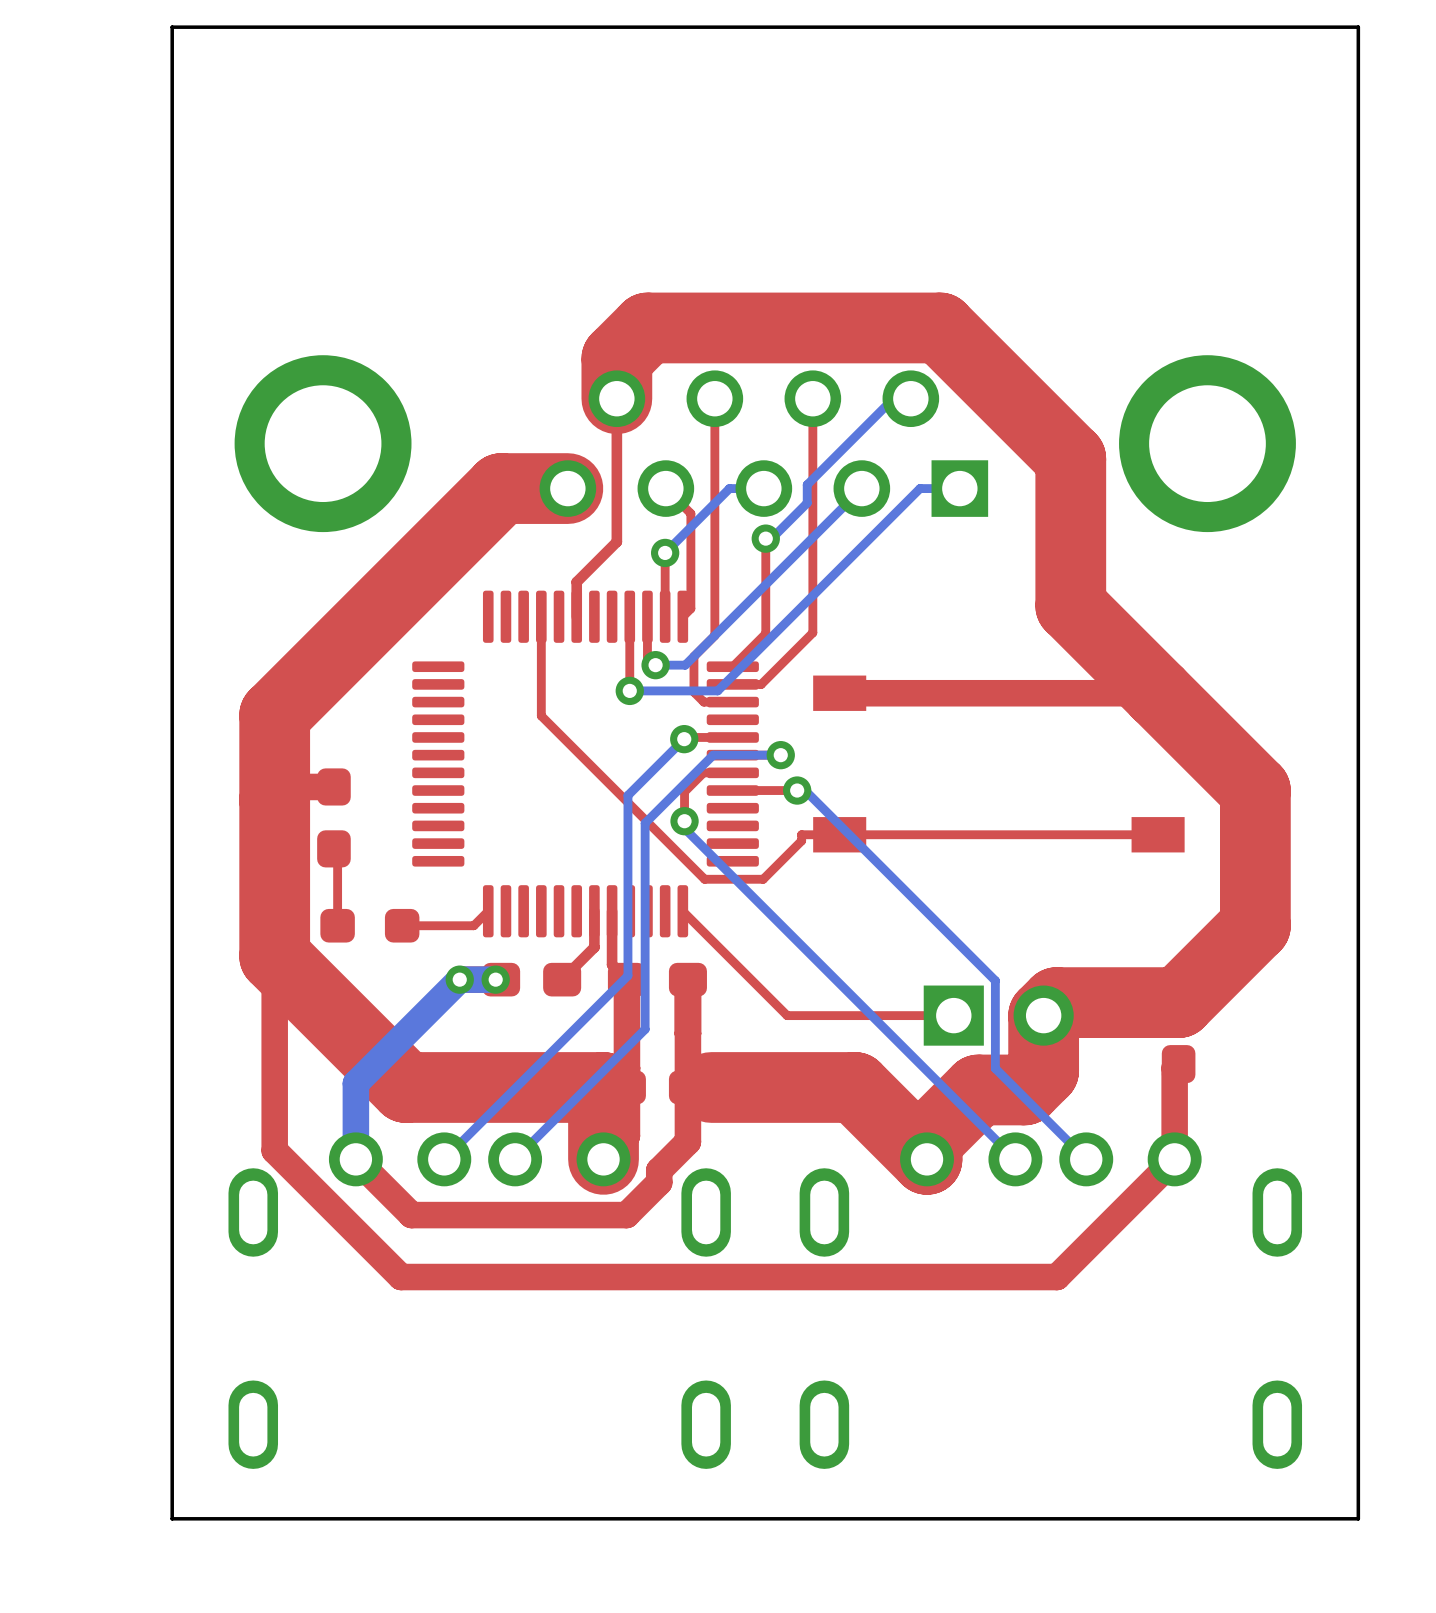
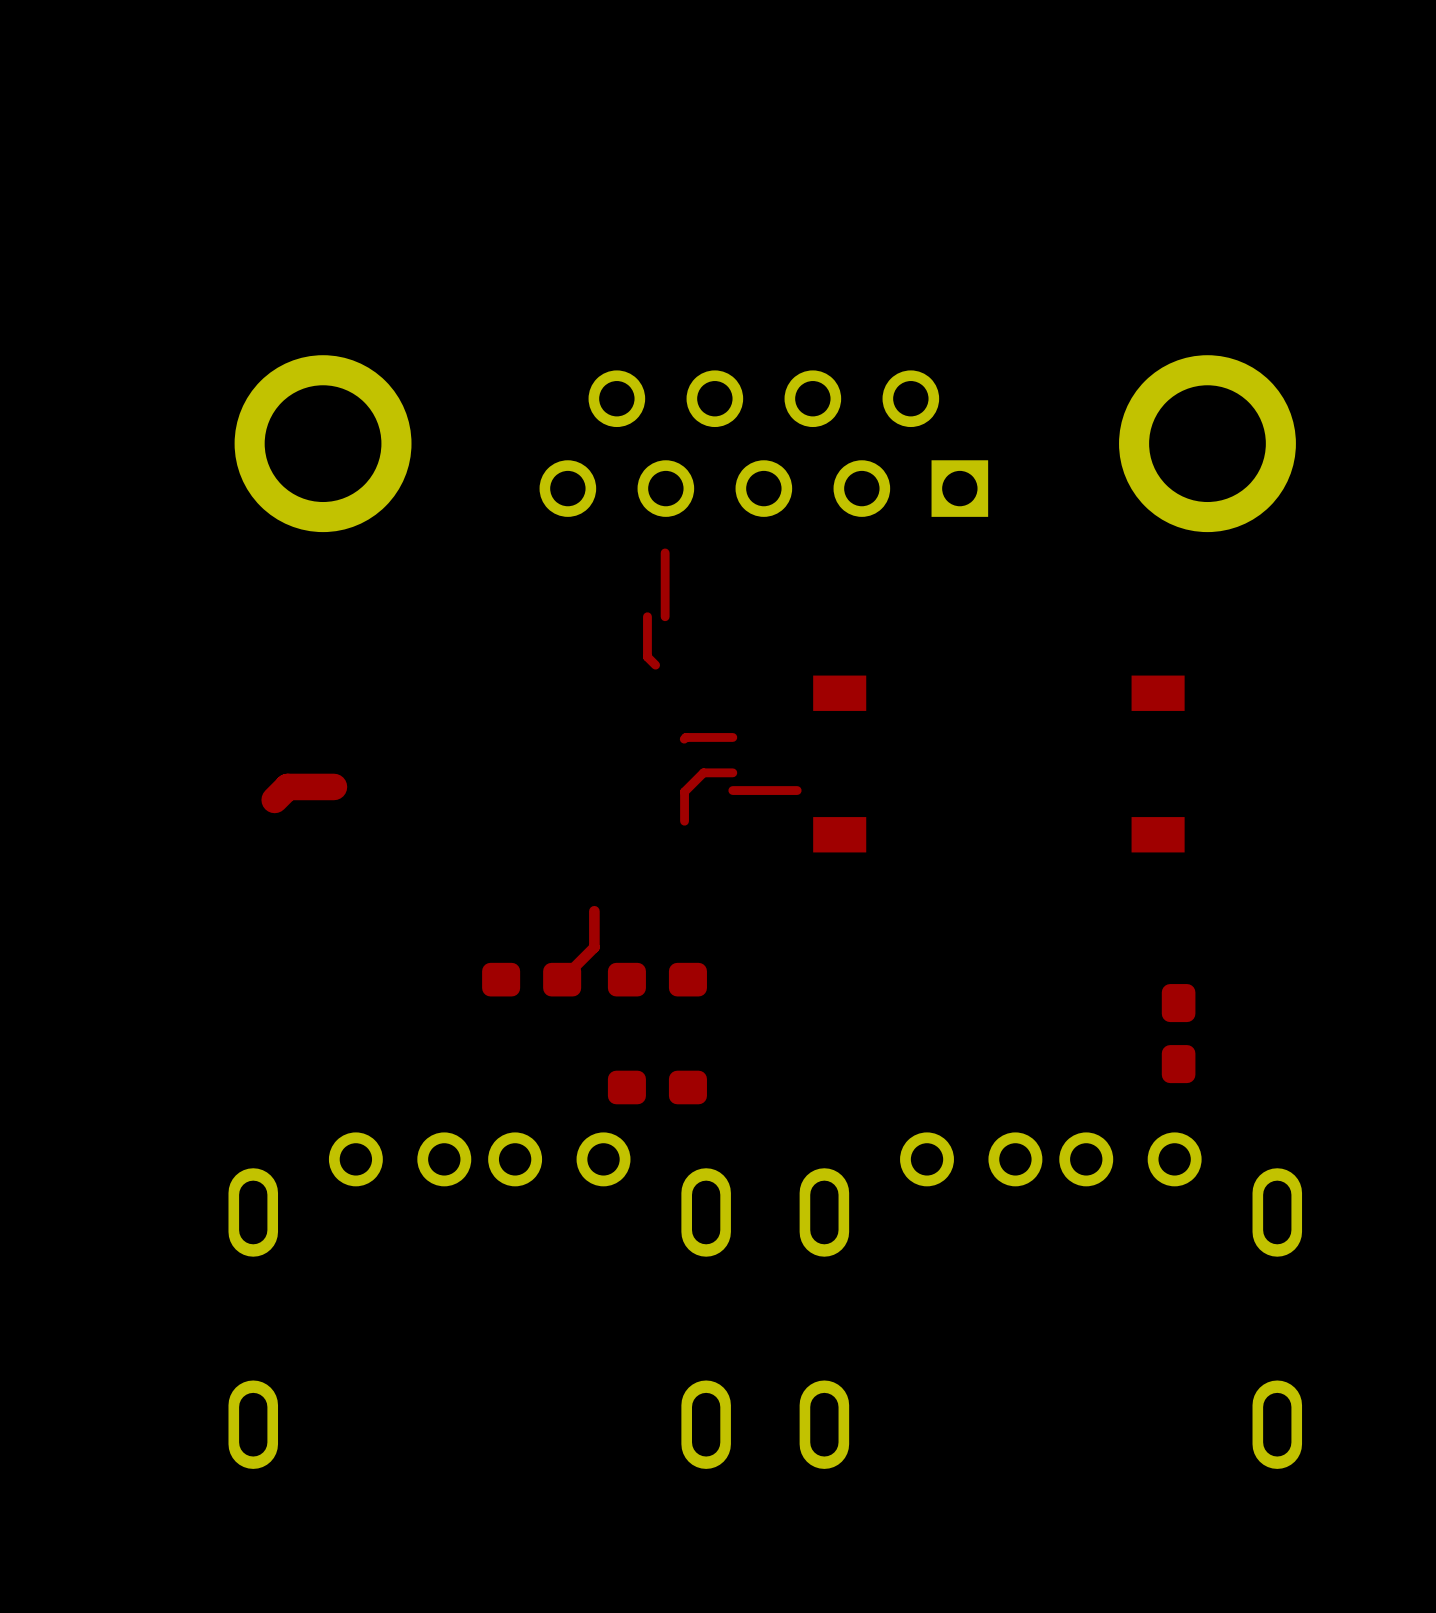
board edge: (1358, 27) (1358, 1518) (172, 1518) (172, 27) (1358, 27) -> none
top track: (714, 398) (714, 635) (693, 656) (693, 692) (703, 702) (732, 702) -> none
top track: (812, 398) (812, 632) (761, 684) (732, 684) -> none
bottom track: (910, 398) (893, 398) (807, 484) (807, 503) (771, 538) (765, 538) -> none
top track: (567, 488) (501, 488) (274, 715) (274, 956) -> none
top track: (665, 488) (690, 513) (690, 608) (682, 616) -> none
bottom track: (763, 488) (729, 488) (665, 552) -> none
bottom track: (861, 488) (685, 665) (655, 665) -> none
bottom track: (959, 488) (920, 488) (717, 690) (629, 690) -> none
top track: (765, 538) (765, 633) (732, 666) -> none
via: (765, 538) -> none
via: (665, 552) -> none
top track: (541, 616) (541, 715) (704, 879) (763, 879) (801, 840) (801, 834) (1158, 834) -> none
top track: (576, 616) (576, 582) (616, 541) (616, 358) (647, 327) (940, 327) (1070, 458) (1070, 605) (1255, 790) (1255, 925) (1178, 1002) (1056, 1002) (1043, 1015) (1043, 1070) (1024, 1089) (978, 1089) (927, 1141) (927, 1159) (855, 1087) (687, 1087) -> none
top track: (629, 616) (629, 690) -> none
via: (655, 665) -> none
via: (629, 690) -> none
top track: (1158, 693) (839, 693) -> none
bottom track: (684, 739) (627, 795) (627, 975) (444, 1159) -> none
via: (684, 739) -> none
bottom track: (780, 755) (713, 755) (645, 823) (645, 1029) (515, 1159) -> none
via: (780, 755) -> none
part: (585, 764) -> none
bottom track: (797, 790) (805, 790) (995, 980) (995, 1068) (1086, 1159) -> none
via: (797, 790) -> none
part: (333, 817) -> none
bottom track: (684, 821) (684, 828) (1015, 1159) -> none
via: (684, 821) -> none
top track: (333, 848) (337, 852) (337, 925) -> none
top track: (488, 911) (473, 925) (402, 925) -> none
top track: (612, 911) (612, 964) (626, 979) (626, 1135) (603, 1159) (603, 1087) (405, 1087) (274, 956) -> none
top track: (682, 911) (787, 1015) (953, 1015) -> none
part: (369, 925) -> none
top track: (274, 956) (274, 1150) (401, 1277) (1056, 1277) (1174, 1159) (1174, 1068) (1178, 1064) -> none
via: (459, 979) -> none
bottom track: (495, 979) (459, 979) (355, 1083) (355, 1159) -> none
via: (495, 979) -> none
top track: (687, 979) (687, 1141) (659, 1170) (659, 1182) (626, 1215) (411, 1215) (355, 1159) -> none
part: (998, 1015) -> none

